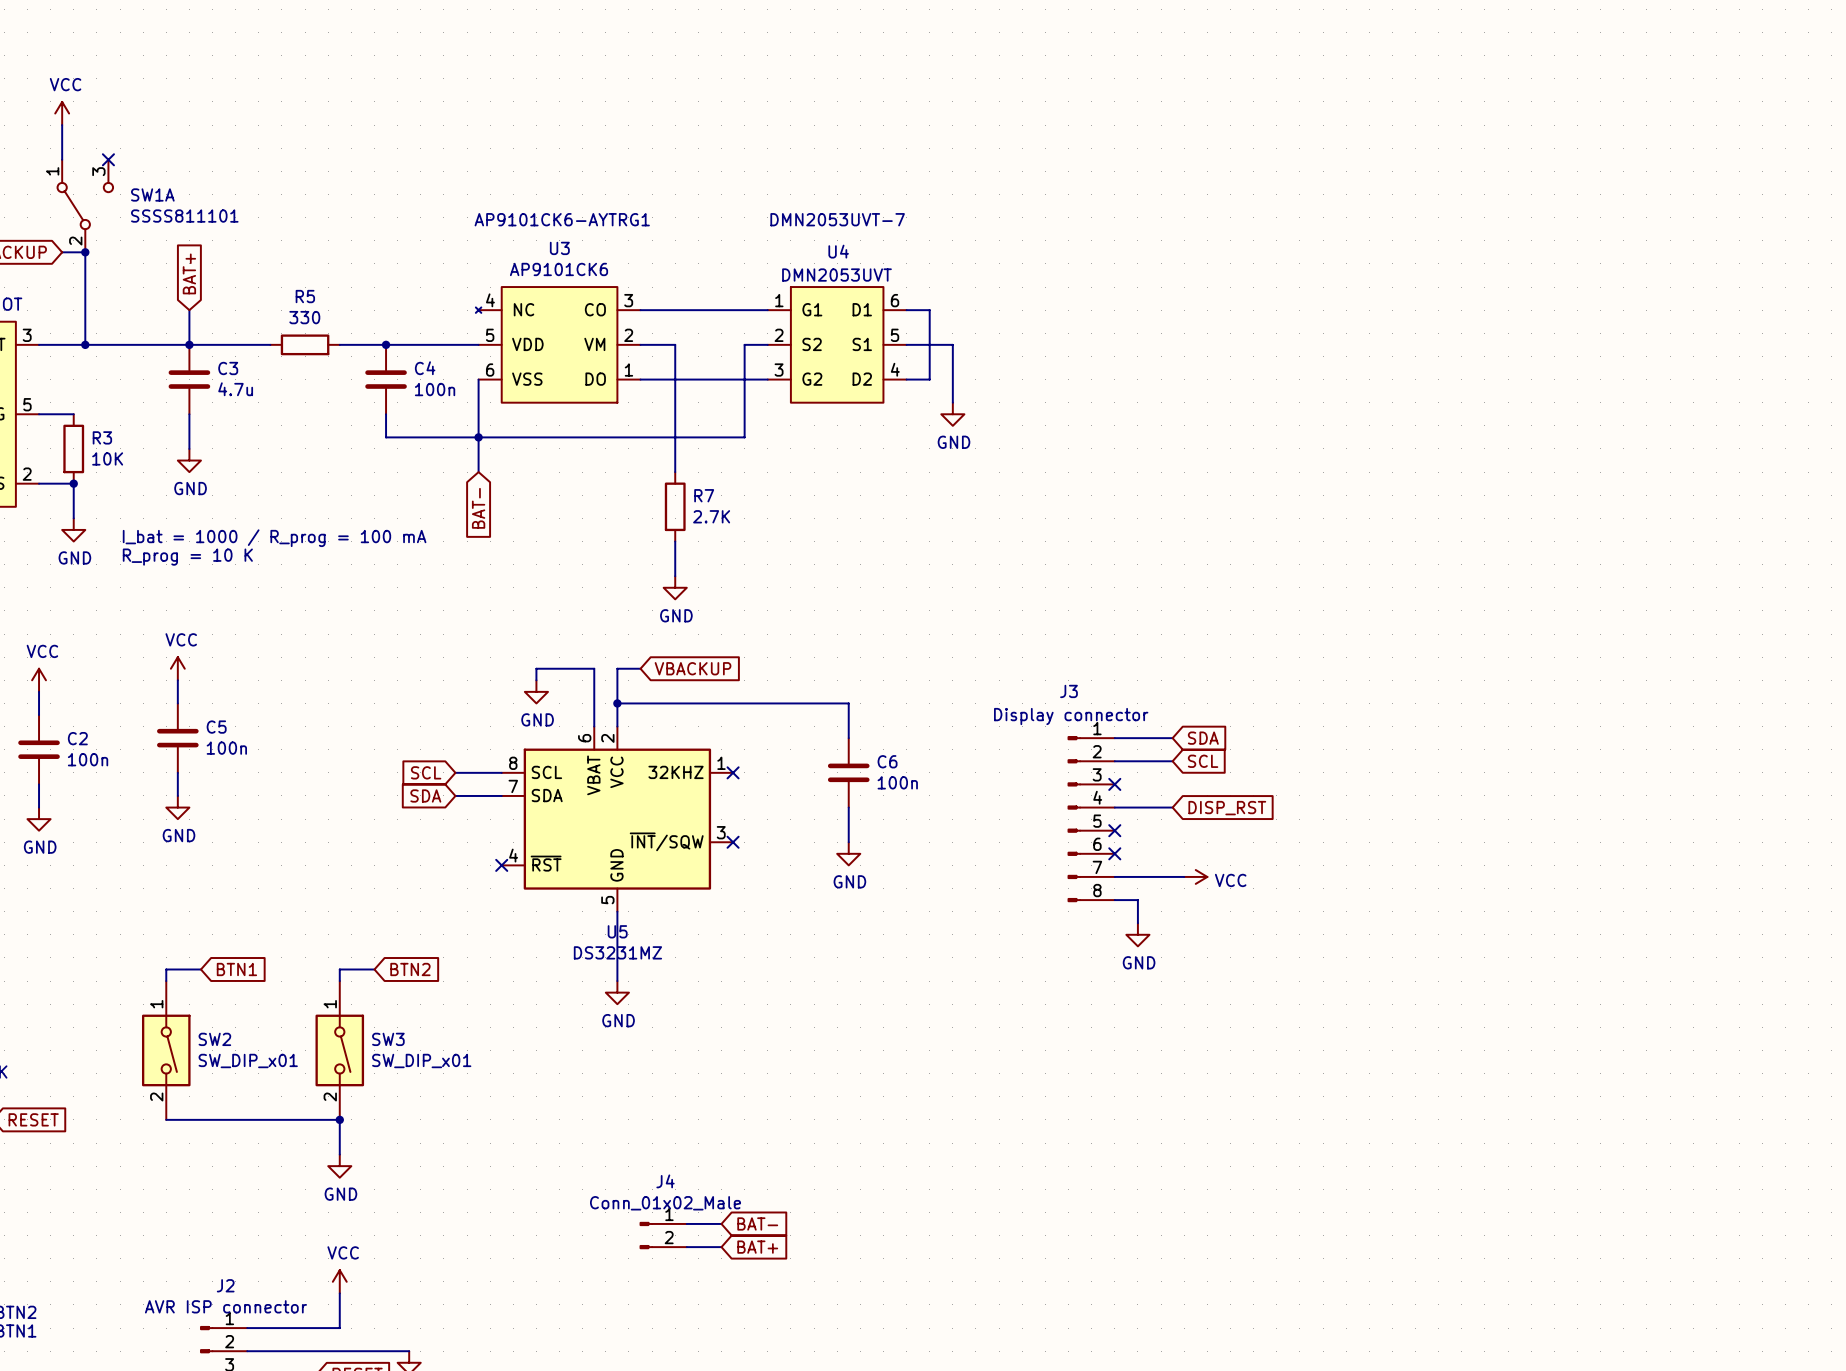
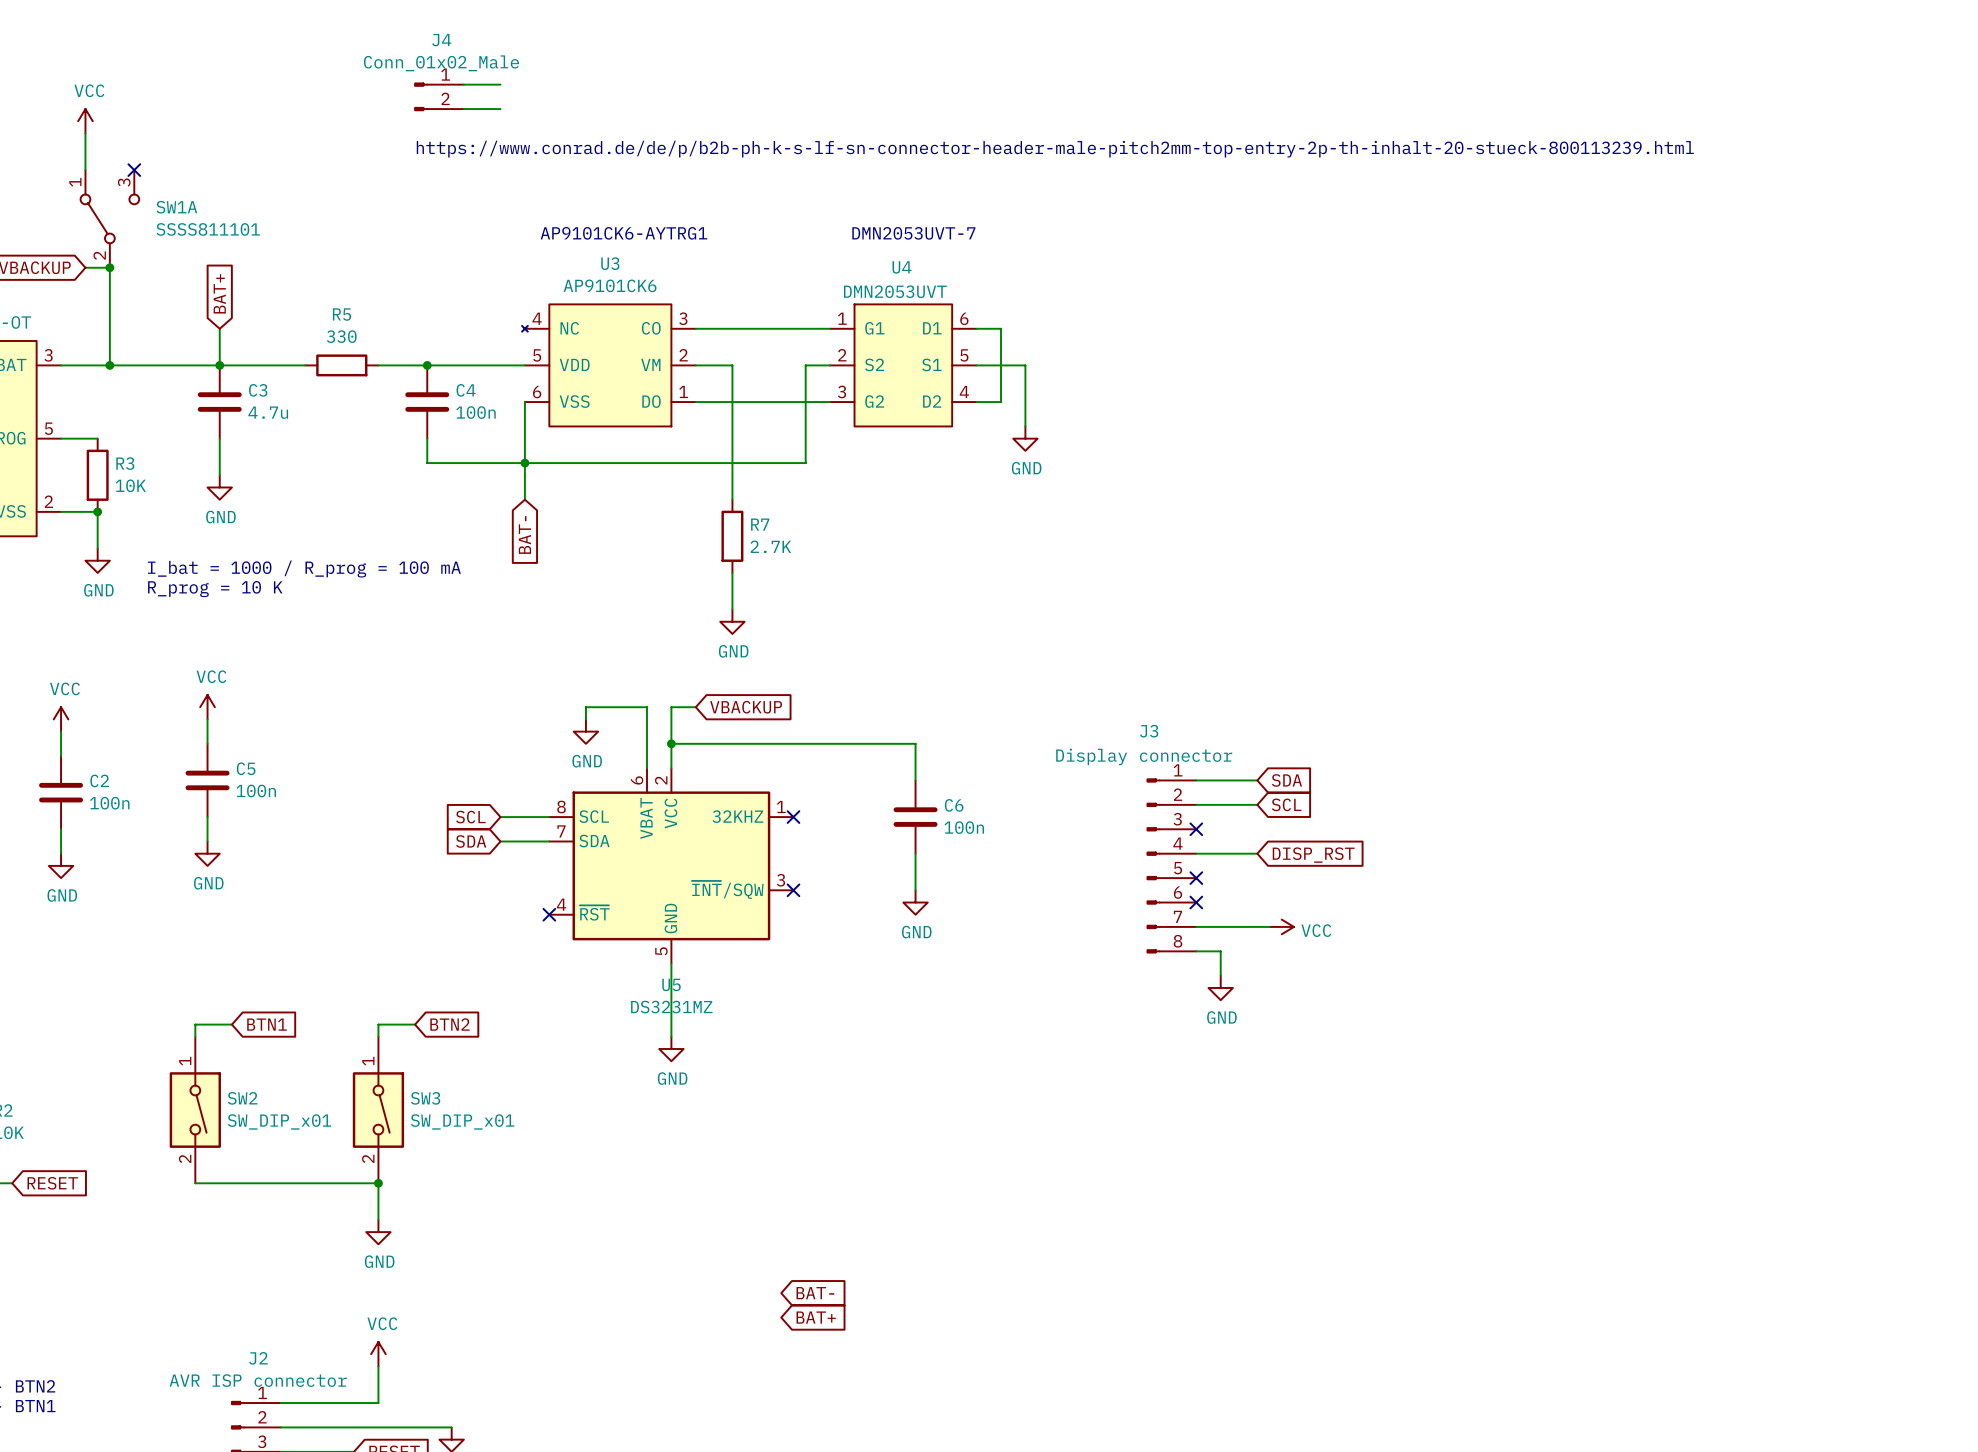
wire: none -> (463, 84) (500, 84)
wire: none -> (463, 109) (500, 109)
text: none -> https://www.conrad.de/de/p/b2b-ph-k-s-lf-sn-connector-header-male-pitch2mm-top-entry-2p-th-inhalt-20-stueck-800113239.html (1055, 149)
wire: (686, 1223) (721, 1223) -> none
J4 position: (663, 1235) -> (439, 96)
wire: (686, 1247) (721, 1247) -> none

